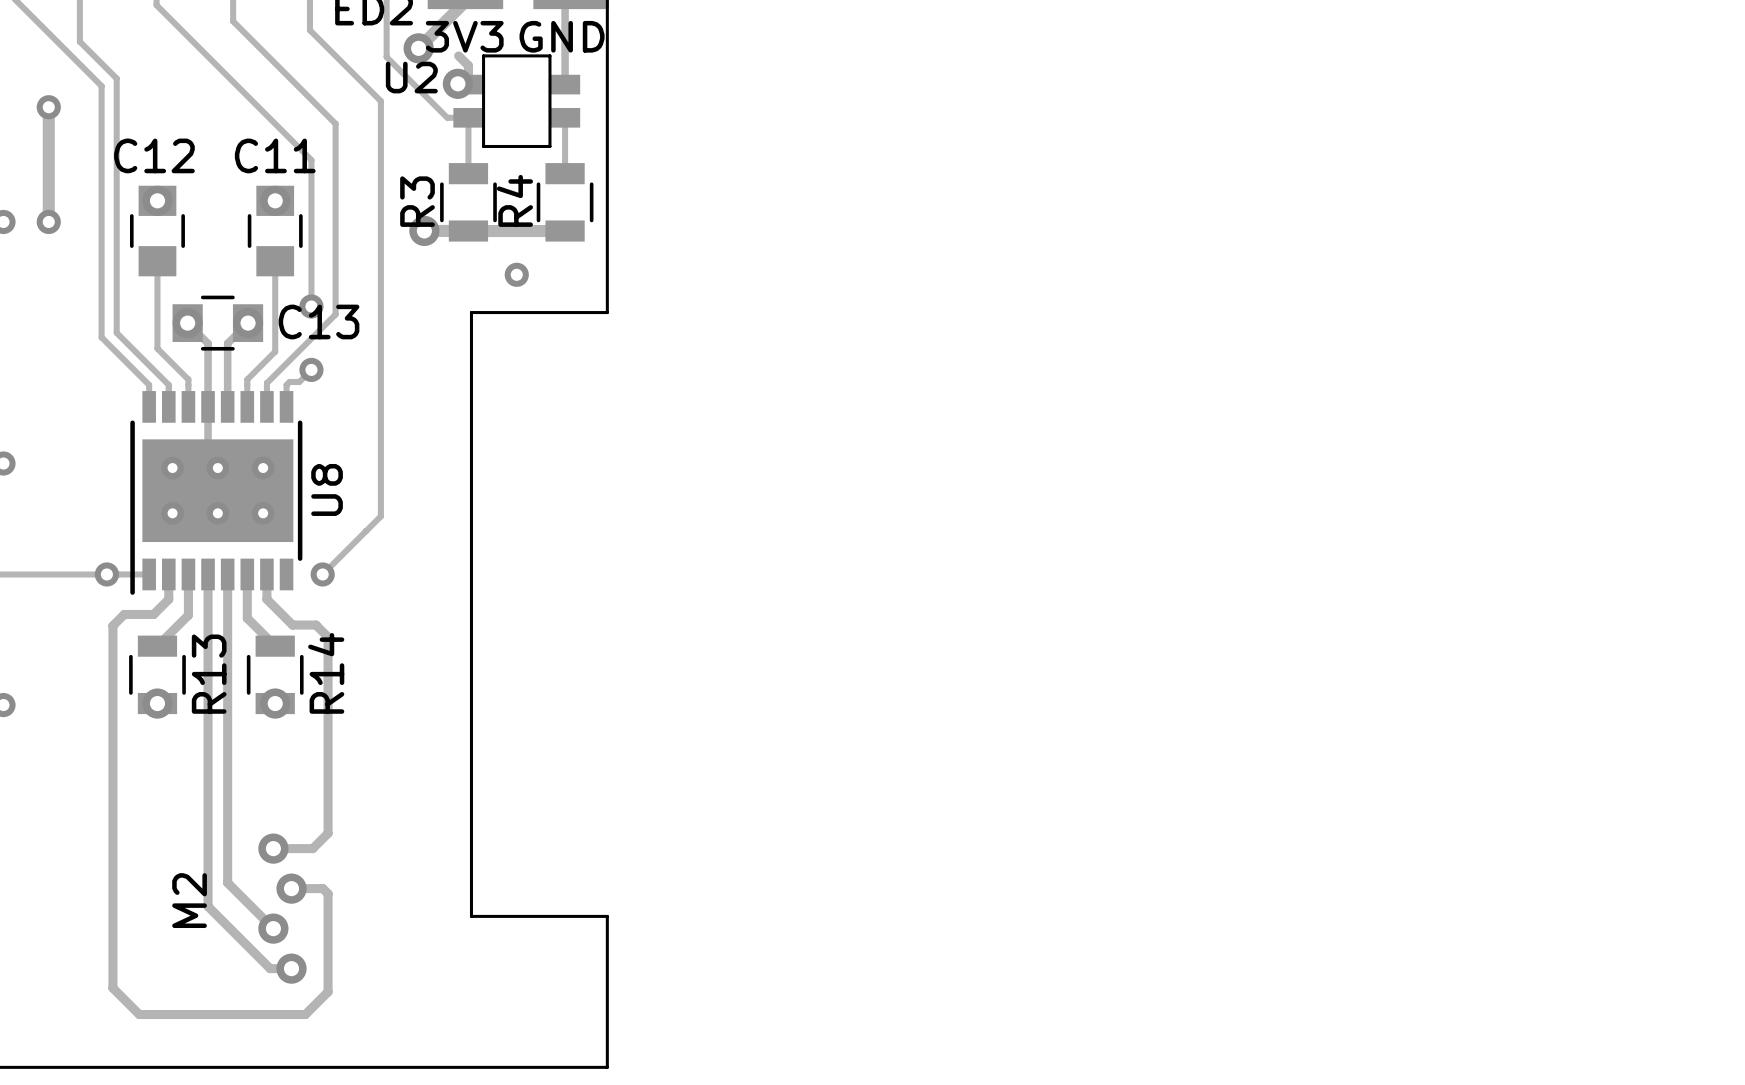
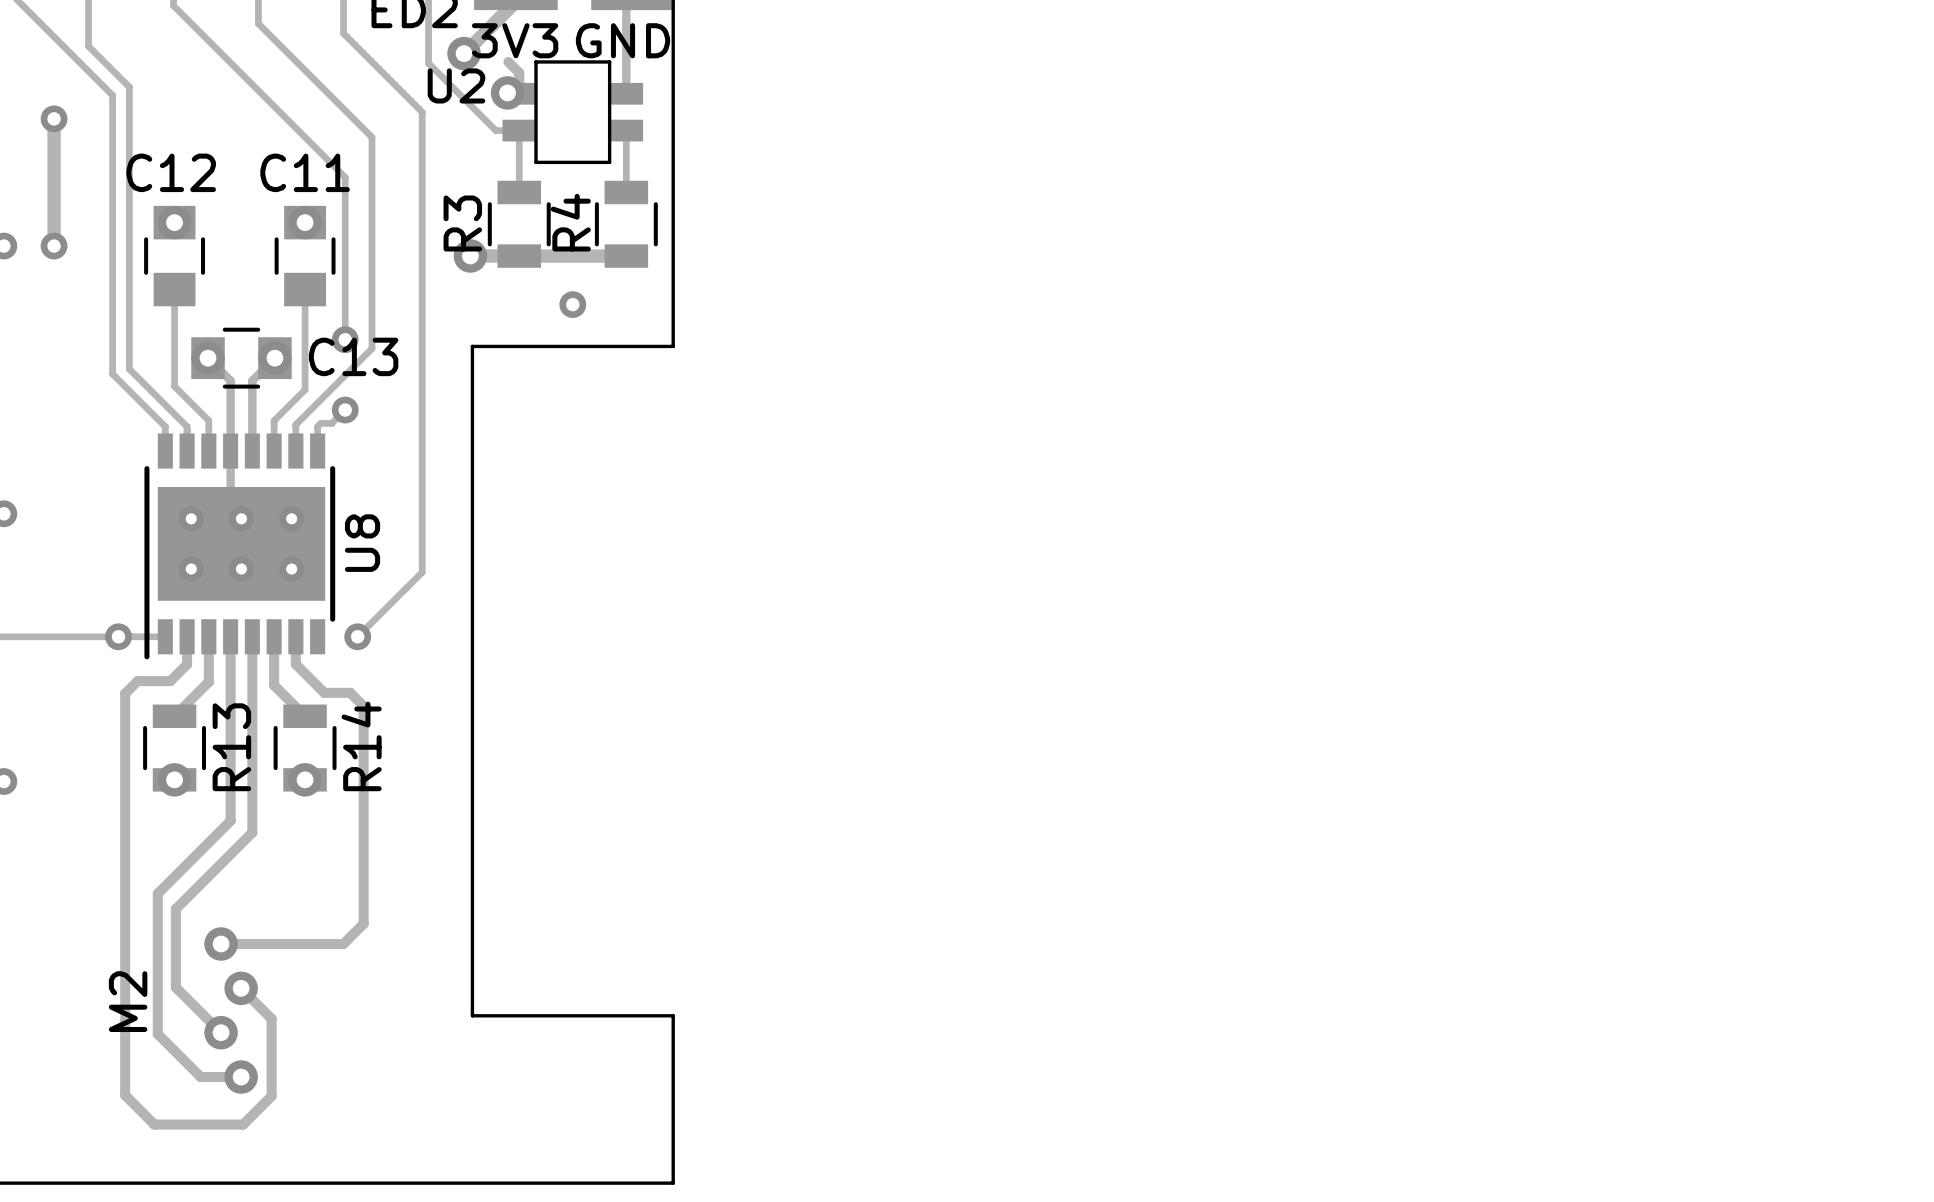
board edge: (471, 312) (471, 916) -> (522, 346) (472, 346) (472, 1015) (522, 1015)
track: (208, 740) (208, 906) (270, 968) (291, 968) -> (230, 820) (157, 893) (157, 1034) (200, 1077) (241, 1077)
track: (227, 751) (227, 882) (273, 928) -> (252, 832) (175, 909) (175, 987) (221, 1032)
track: (273, 848) (312, 848) -> (221, 944) (343, 944) (346, 940)
track: (291, 888) (322, 888) (328, 893) (328, 991) (305, 1014) (219, 1014) -> (241, 988) (271, 1018) (271, 1096) (243, 1124)
M2 position: (282, 908) -> (231, 1010)

